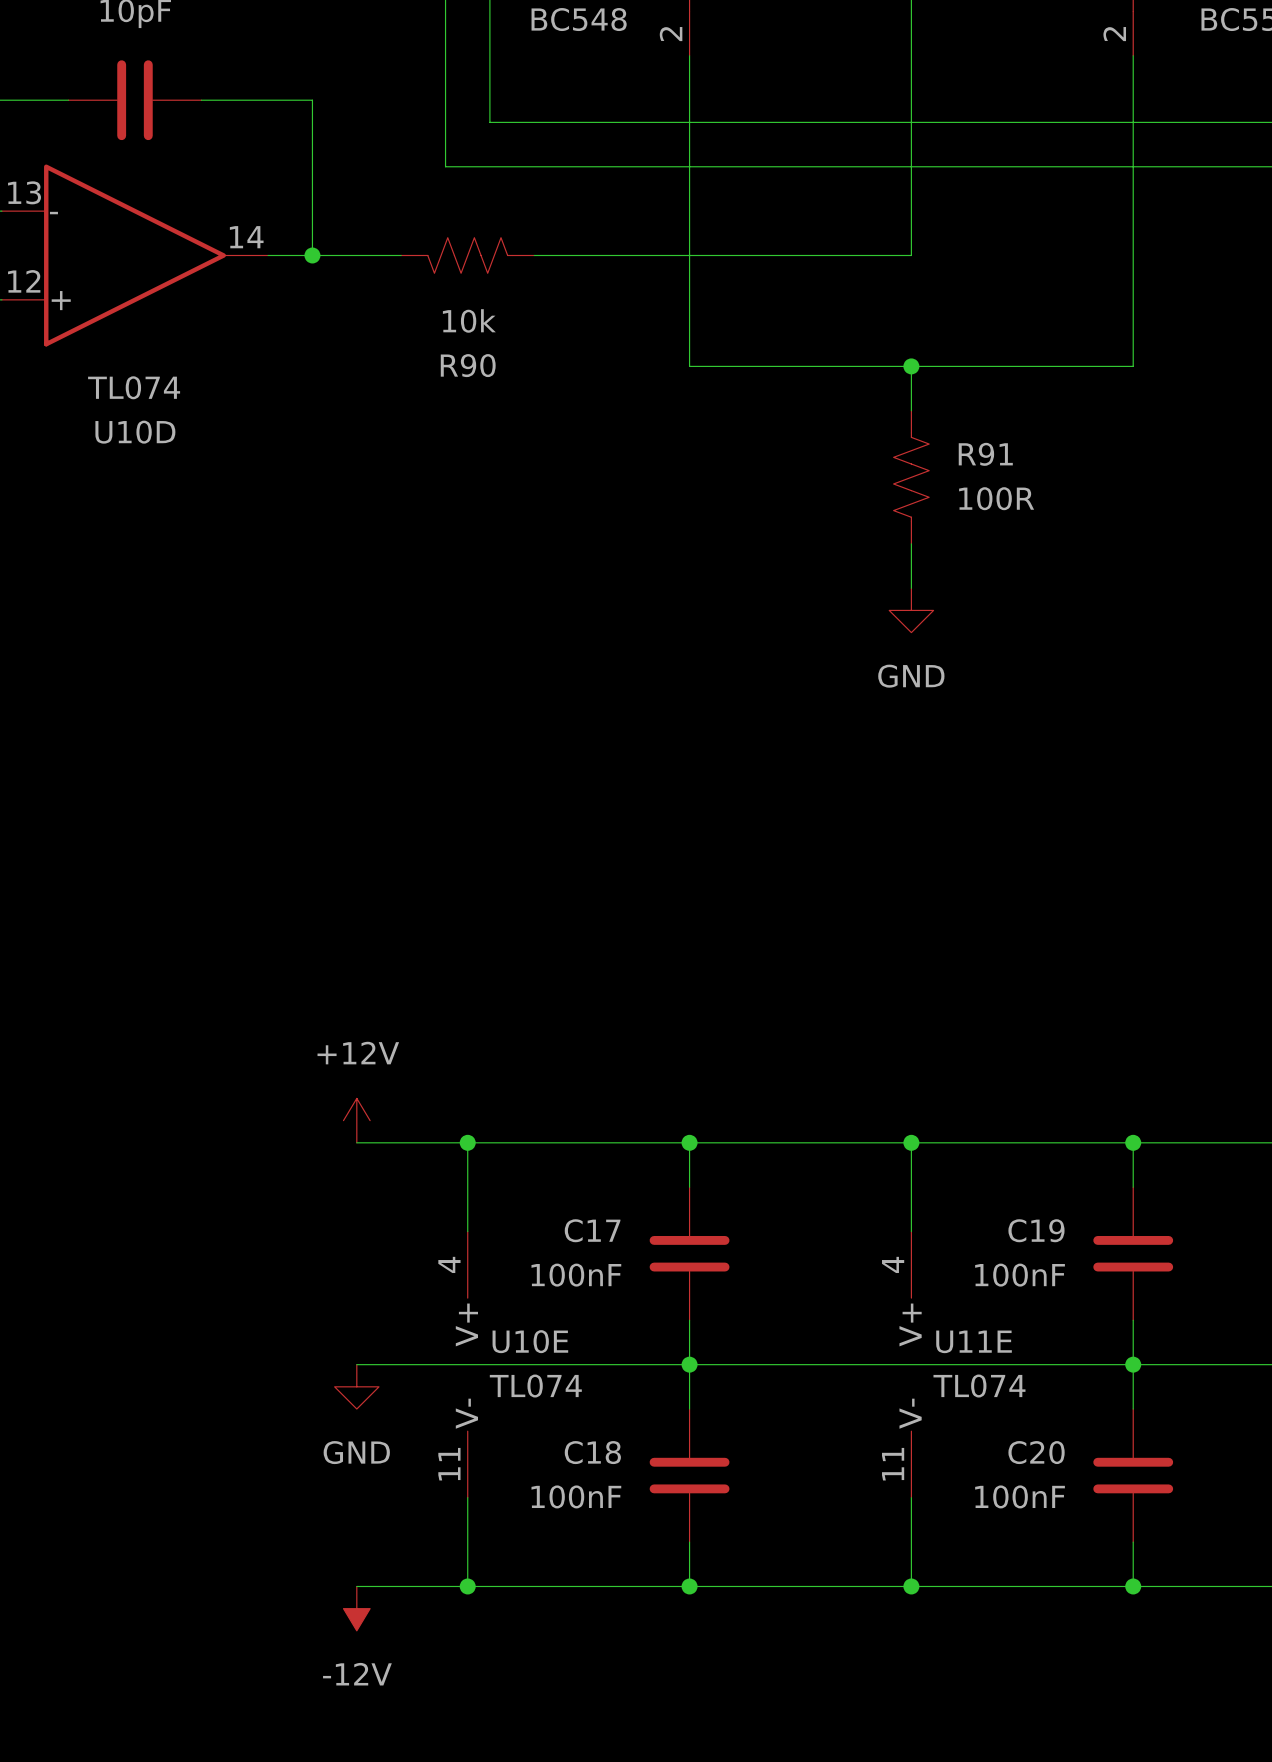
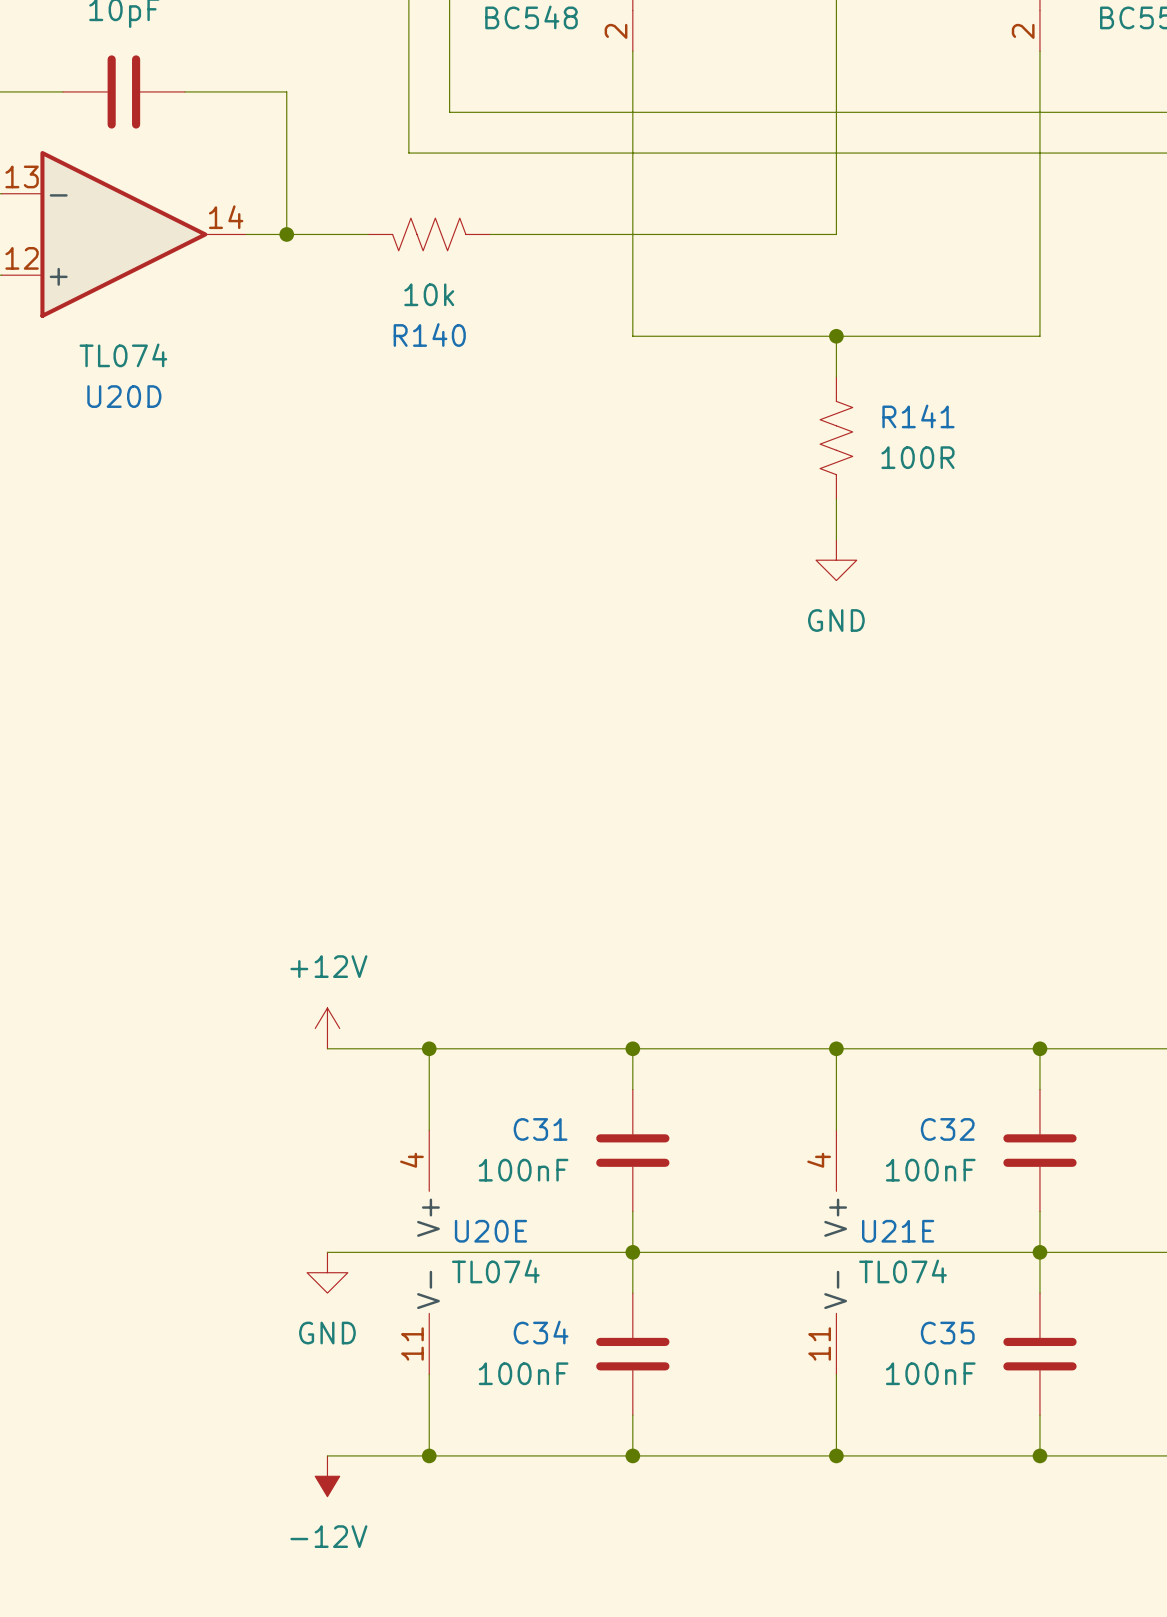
R90 name: R90 (468, 365) -> R140 (429, 335)
U10D name: U10D (135, 432) -> U20D (124, 396)
R91 name: R91 (985, 454) -> R141 (918, 416)
C17 name: C17 (592, 1230) -> C31 (540, 1129)
C19 name: C19 (1036, 1230) -> C32 (947, 1129)
U10E name: U10E (530, 1341) -> U20E (490, 1231)
U11E name: U11E (974, 1341) -> U21E (898, 1231)
C18 name: C18 (592, 1452) -> C34 (541, 1332)
C20 name: C20 (1036, 1452) -> C35 (947, 1333)

